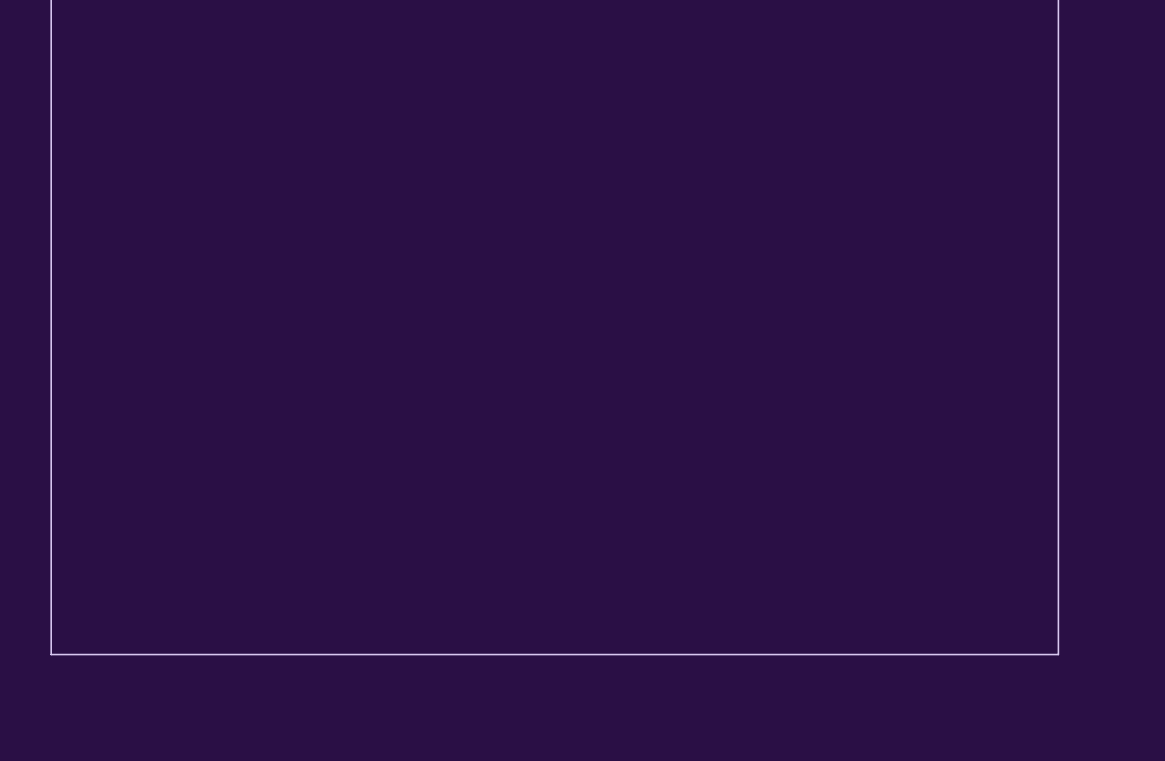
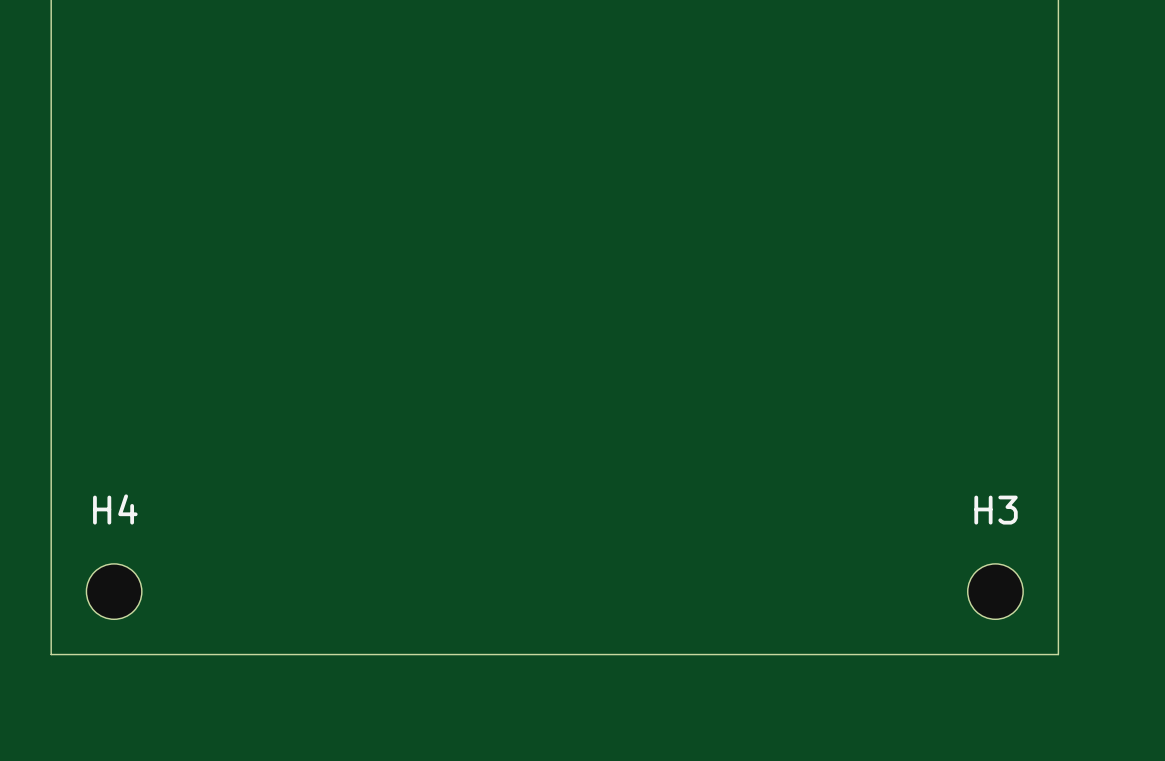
H4: none -> (114, 591)
H3: none -> (995, 591)

